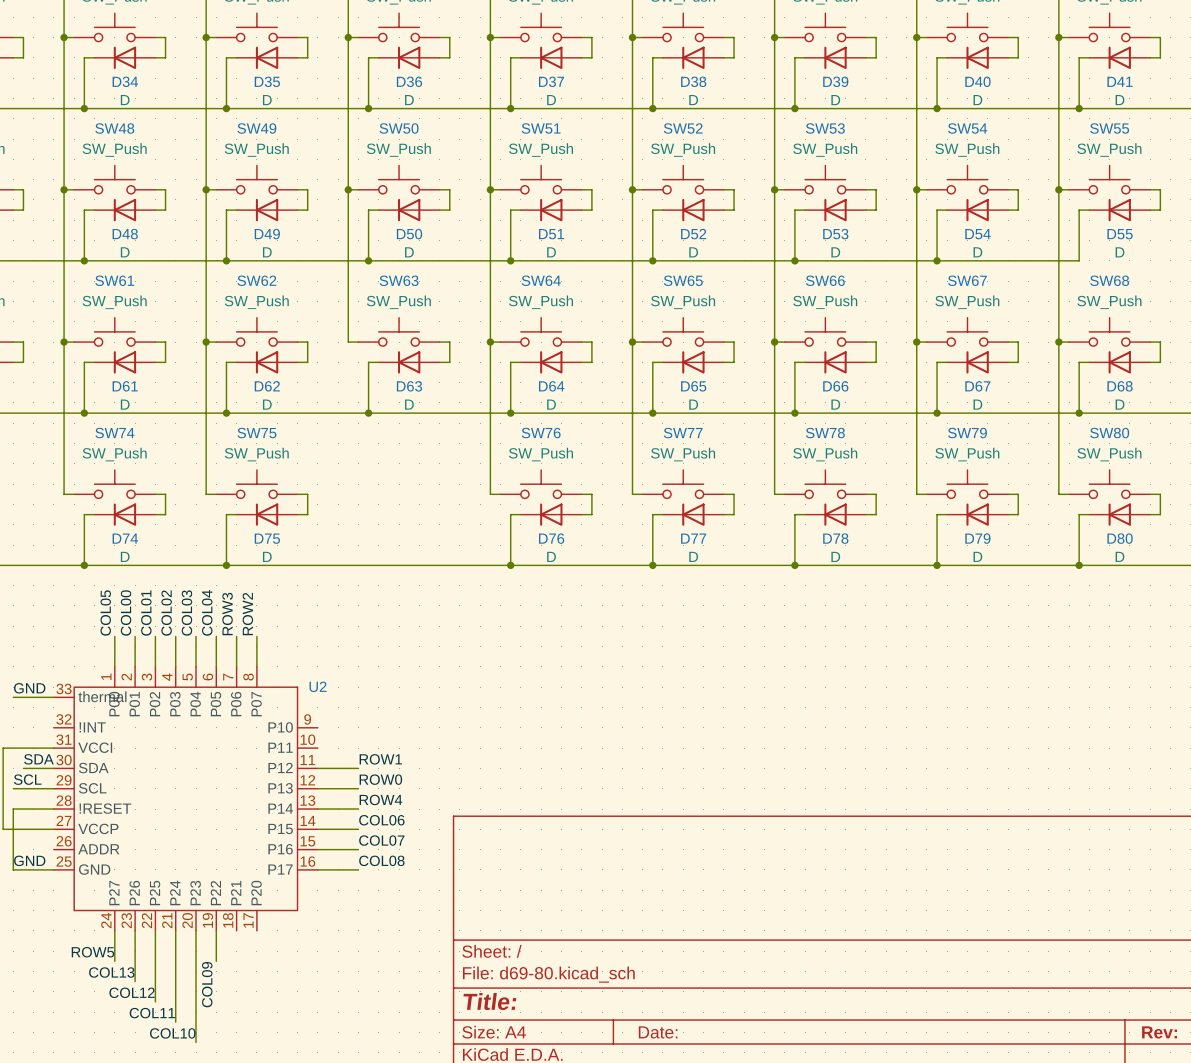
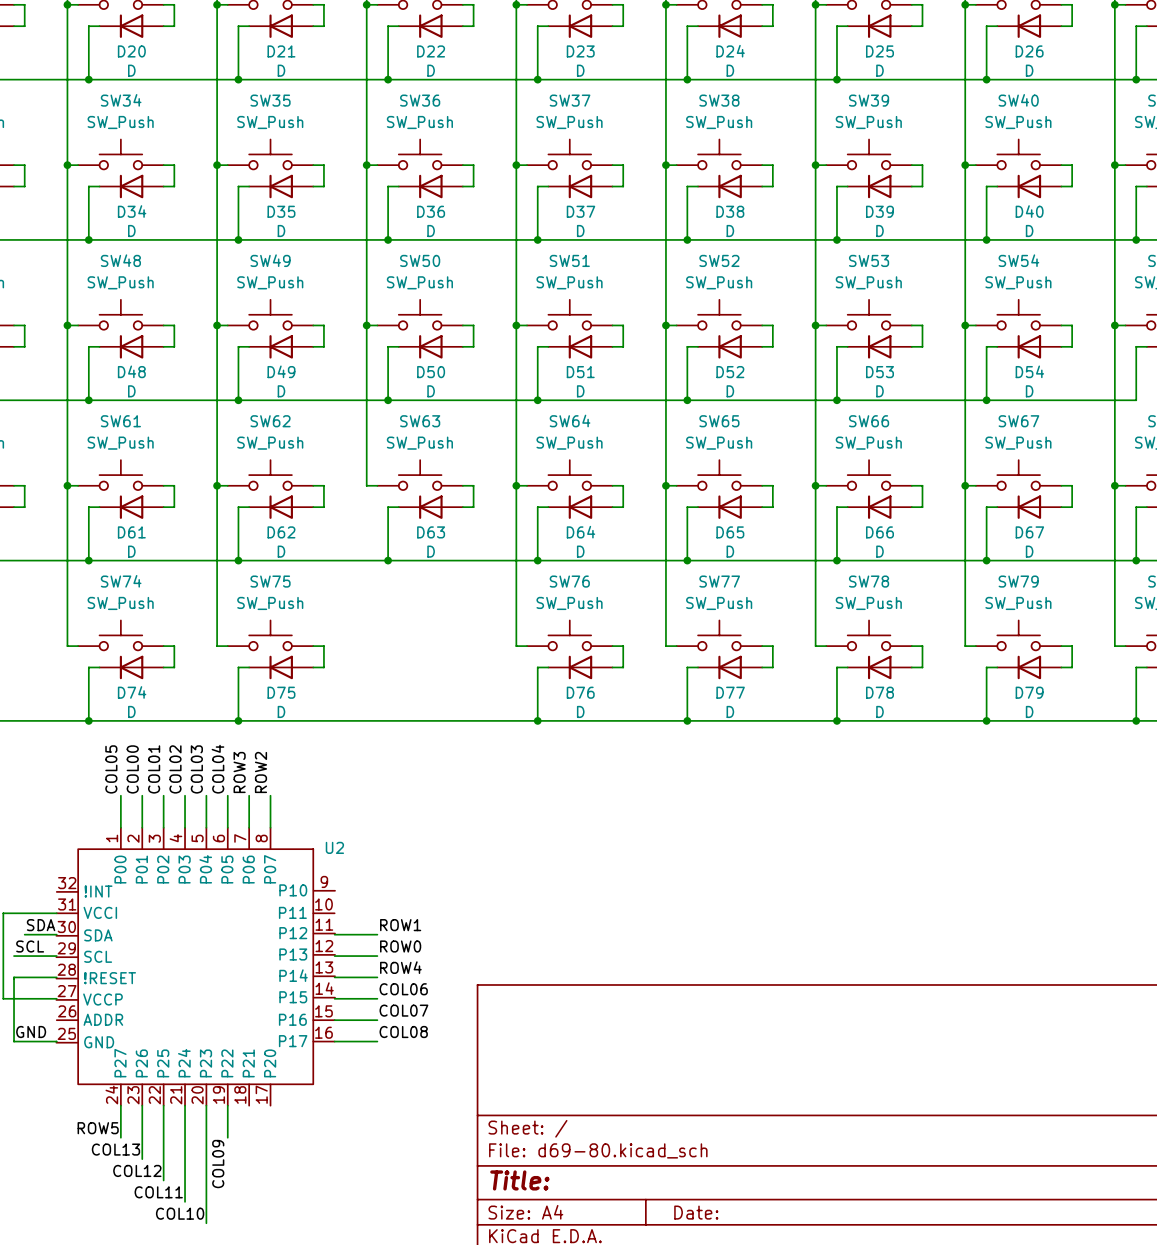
U2 symbol: [53, 666, 318, 931] -> [56, 827, 336, 1106]
label: GND (29, 688) -> none
wire: (13, 697) (53, 697) -> none

